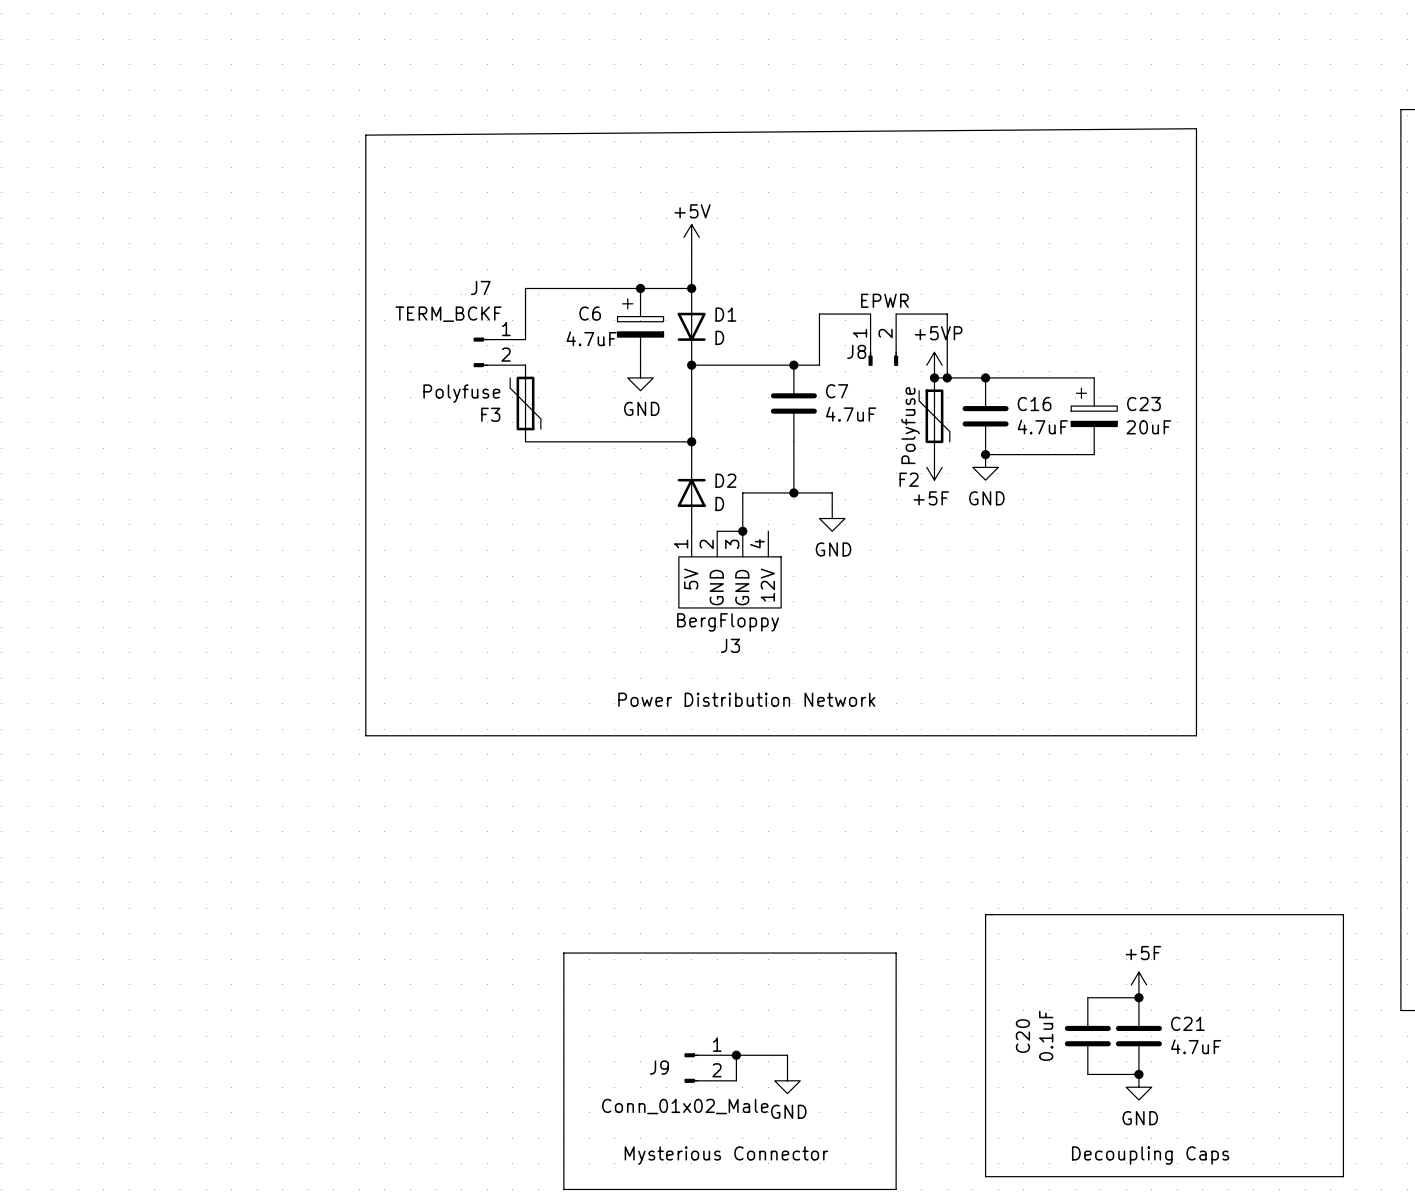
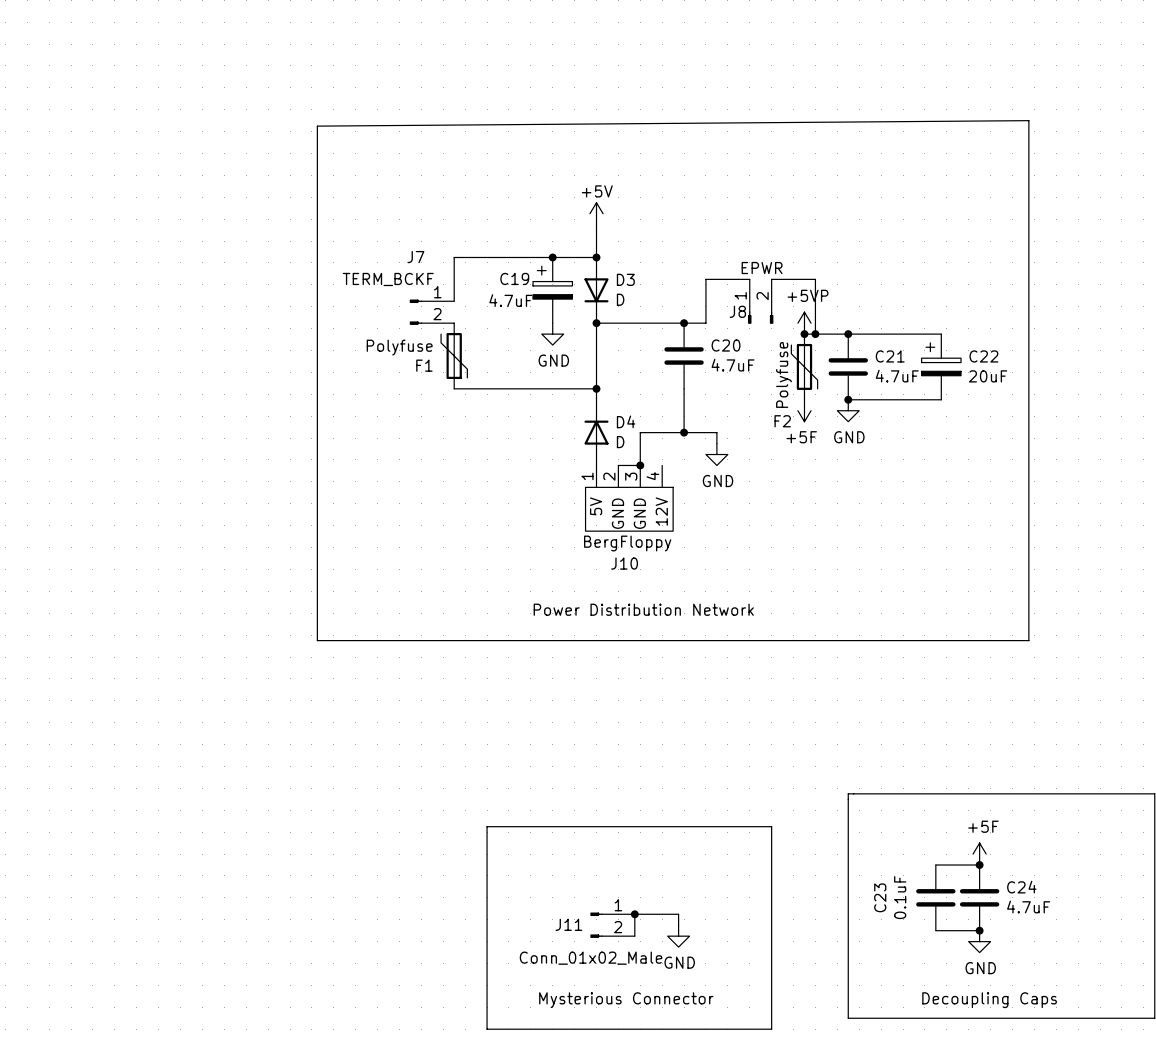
C6 name: C6 (590, 313) -> C19 (514, 278)
D1 name: D1 (725, 314) -> D3 (625, 279)
C7 name: C7 (837, 391) -> C20 (726, 345)
C16 name: C16 (1034, 404) -> C21 (890, 356)
C23 name: C23 (1143, 404) -> C22 (983, 356)
F3 name: F3 (490, 414) -> F1 (424, 365)
D2 name: D2 (725, 480) -> D4 (626, 421)
J3 name: J3 (730, 645) -> J10 (624, 563)
C21 name: C21 (1187, 1023) -> C24 (1021, 887)
C20 name: C20 (1022, 1036) -> C23 (880, 897)
J9 name: J9 (659, 1067) -> J11 (568, 924)

